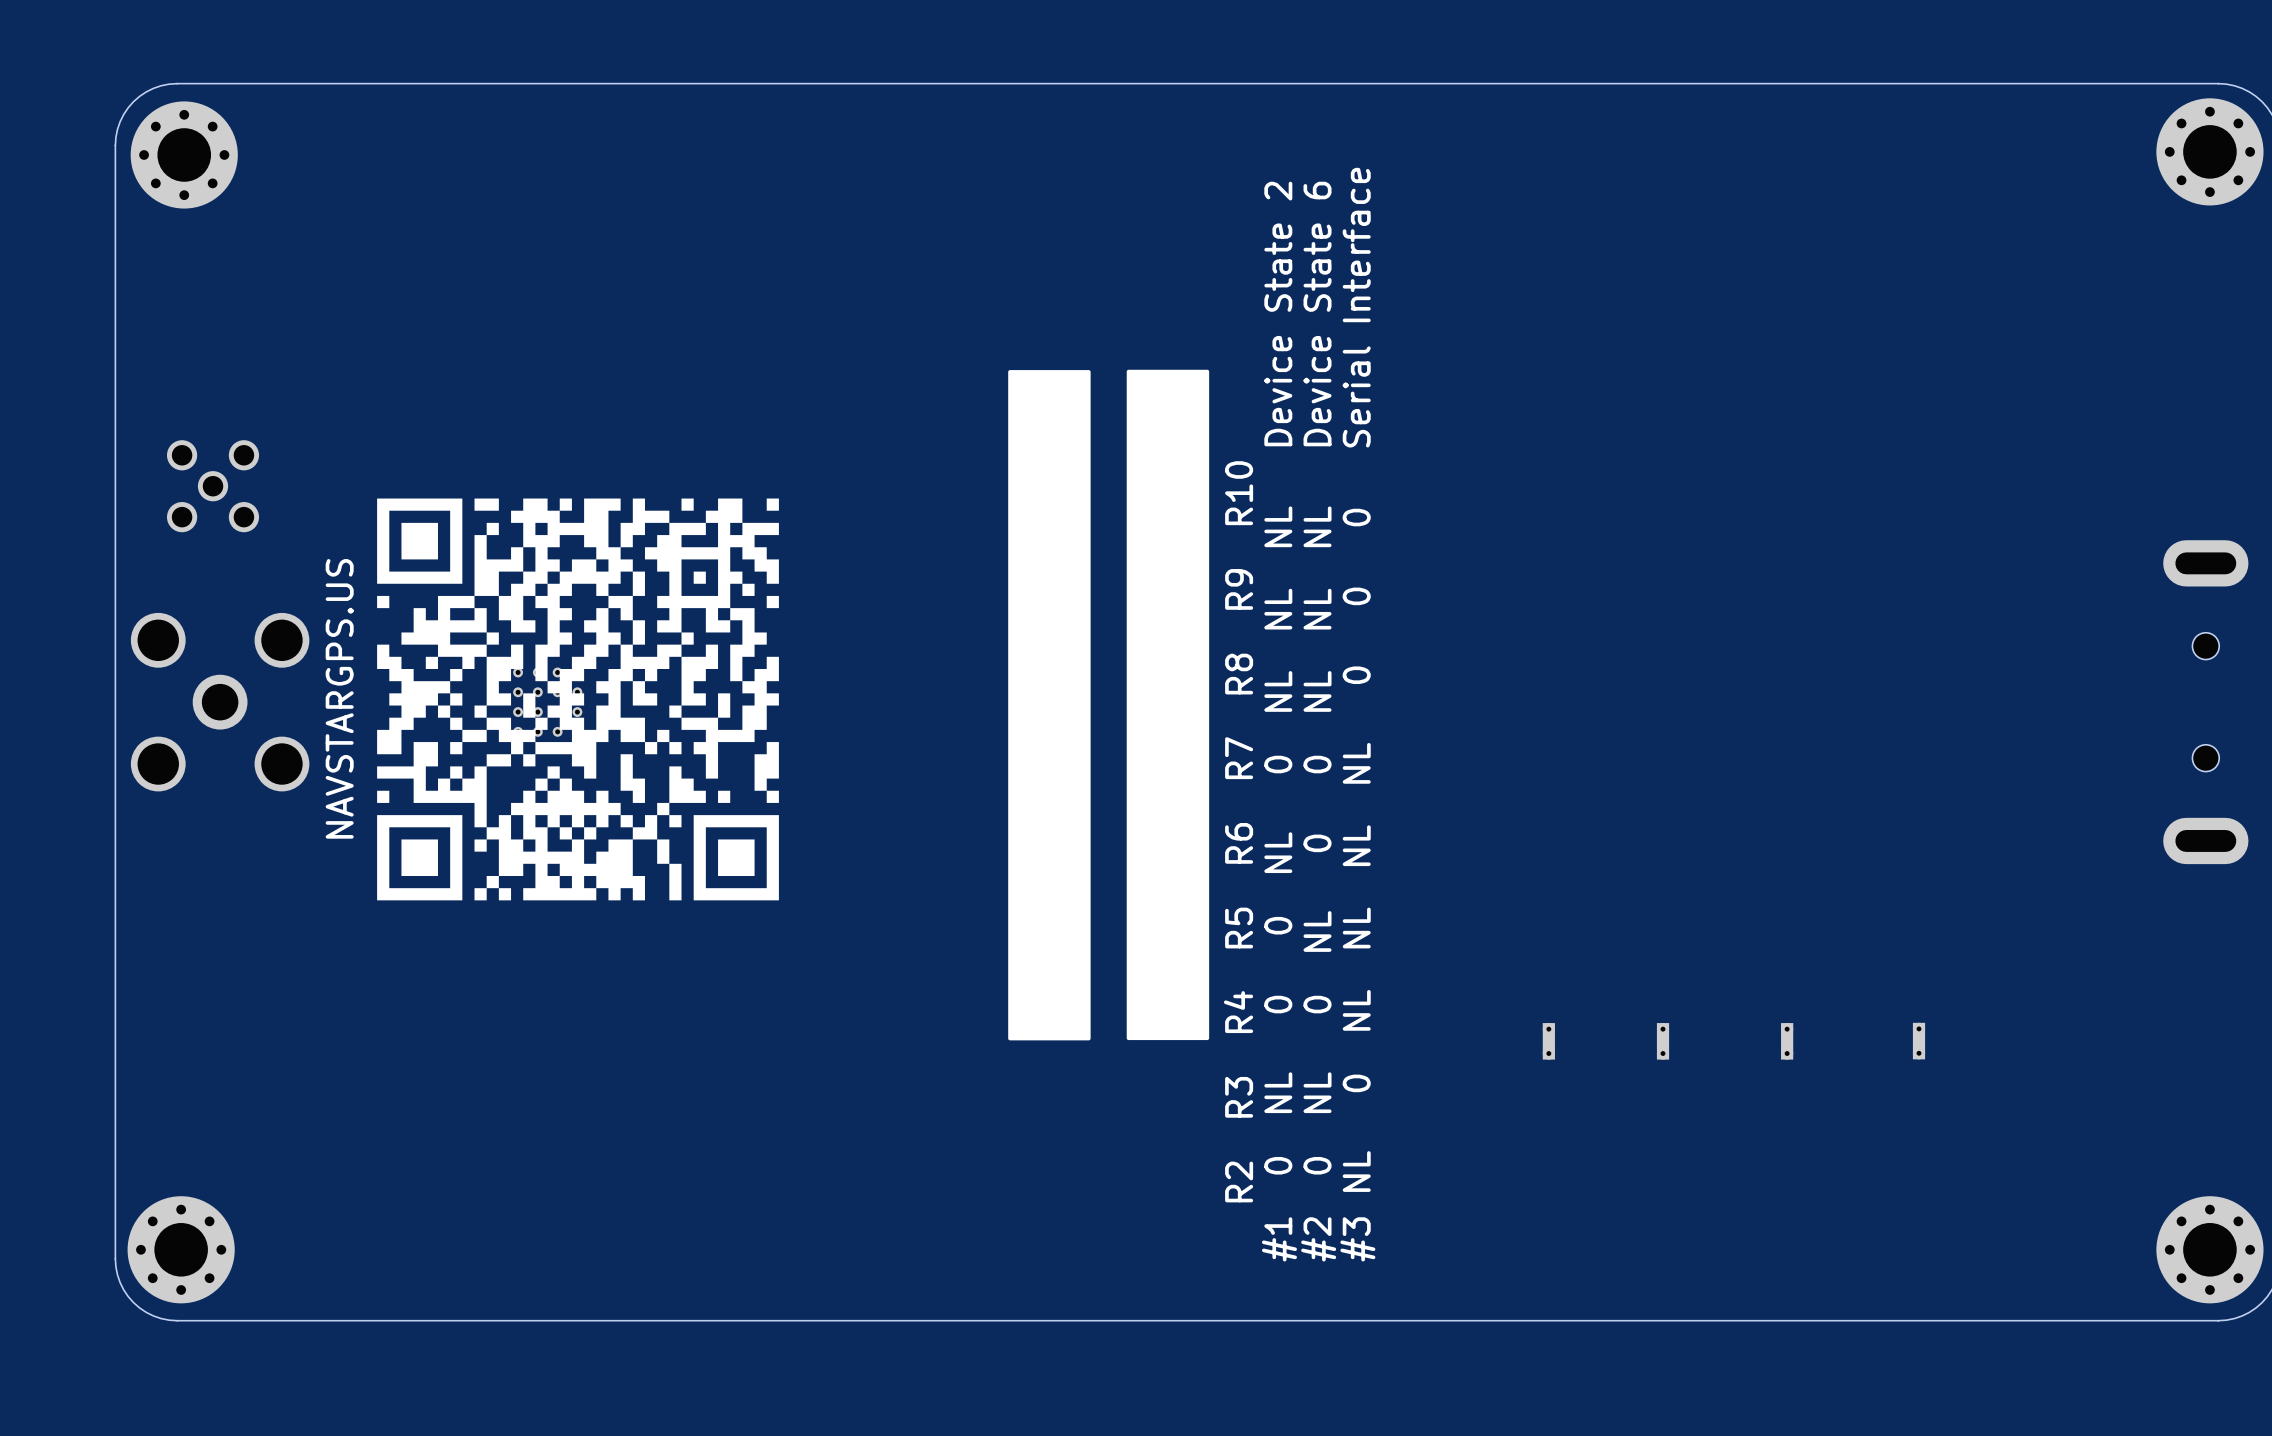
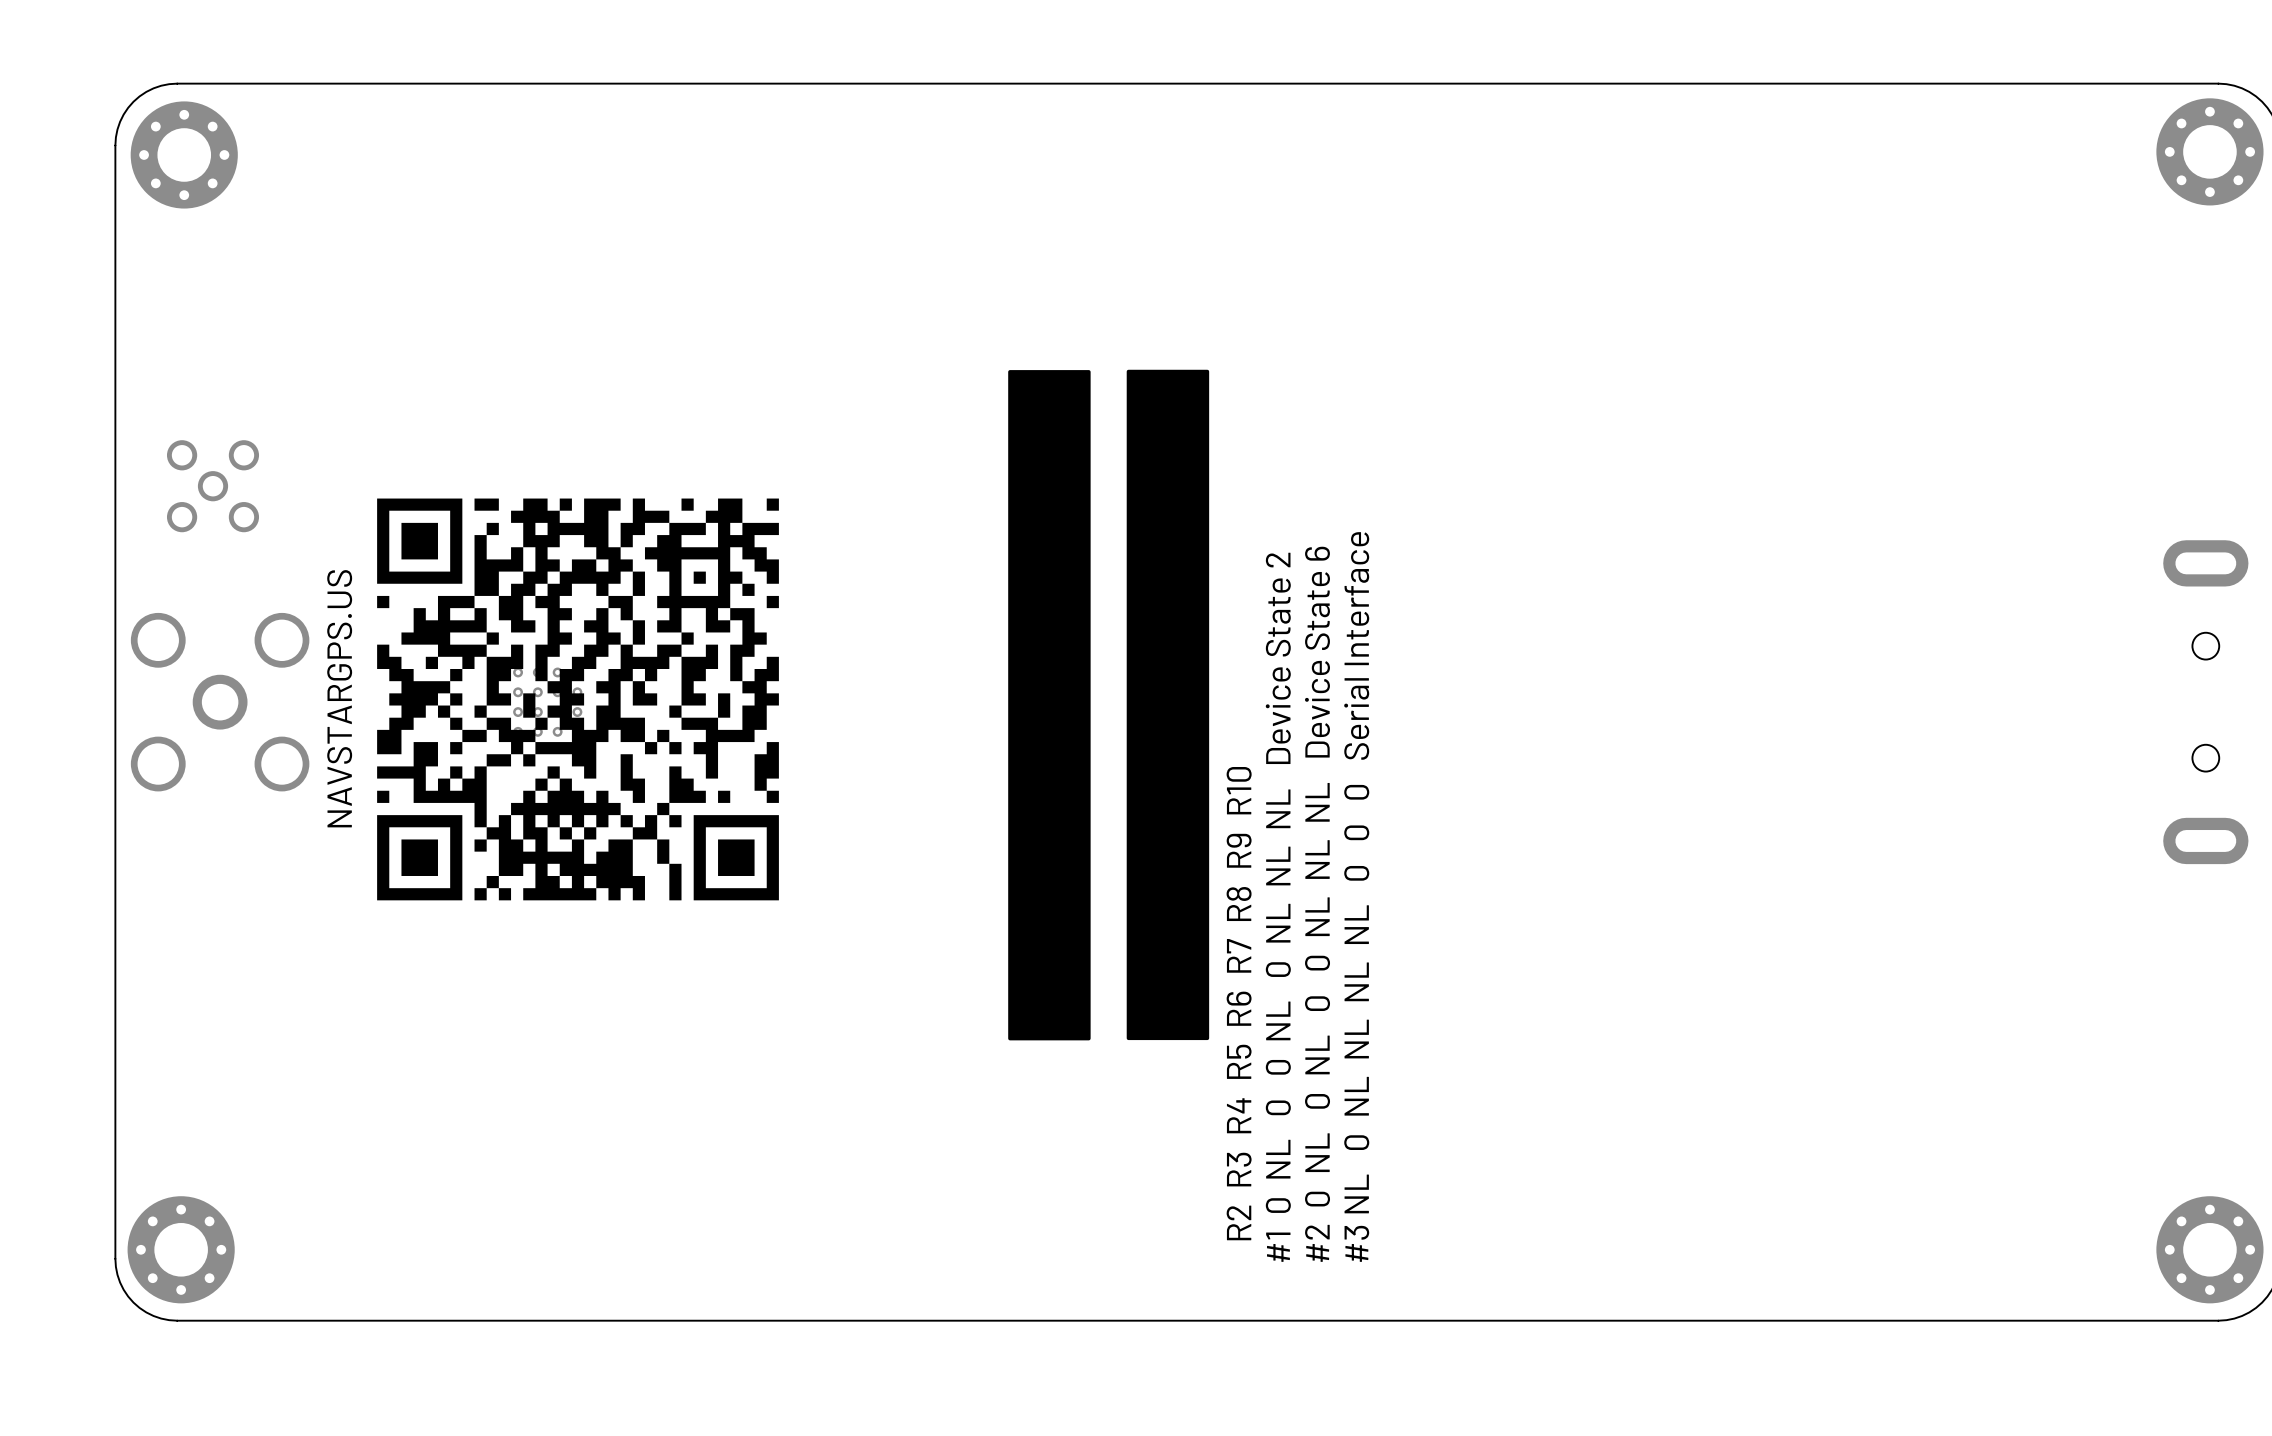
part: (1548, 1041) -> none
part: (1663, 1041) -> none
part: (1787, 1041) -> none
part: (1919, 1041) -> none

